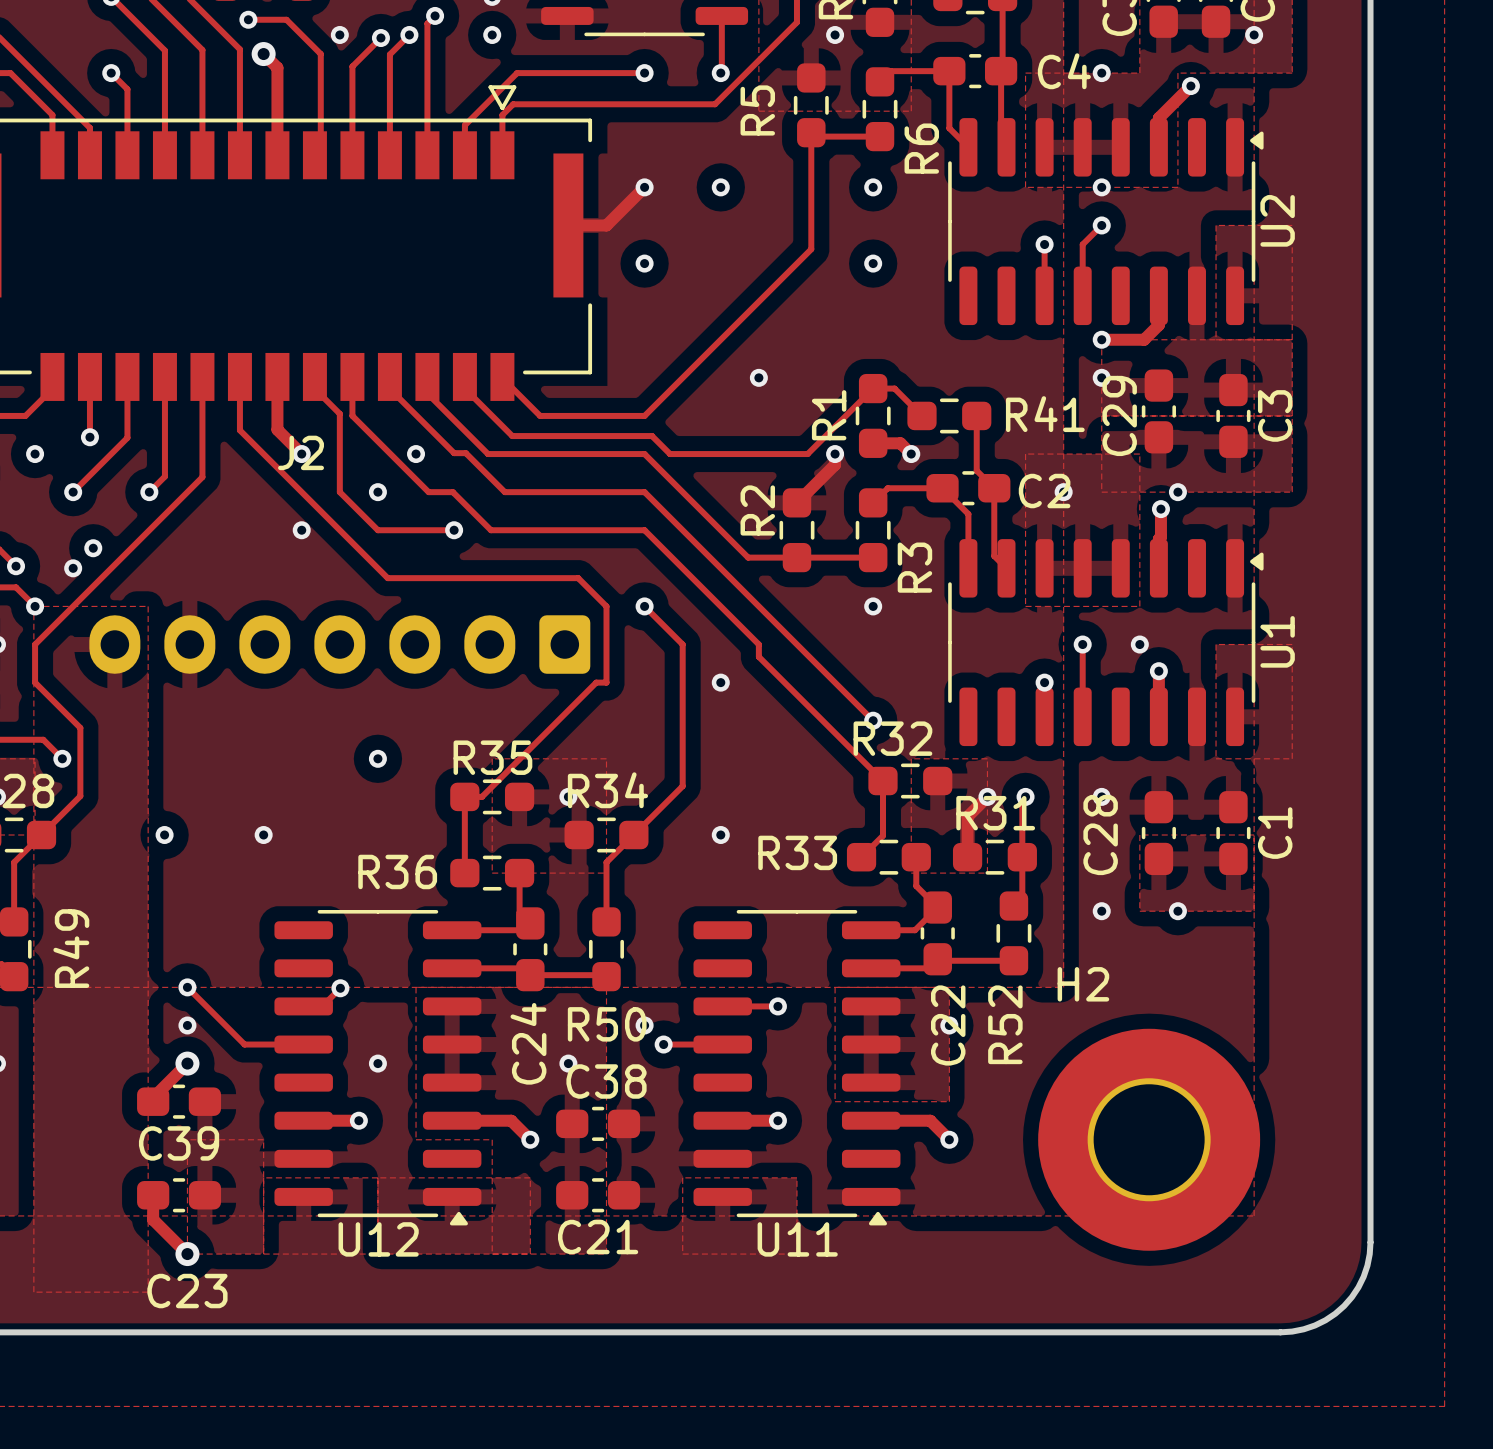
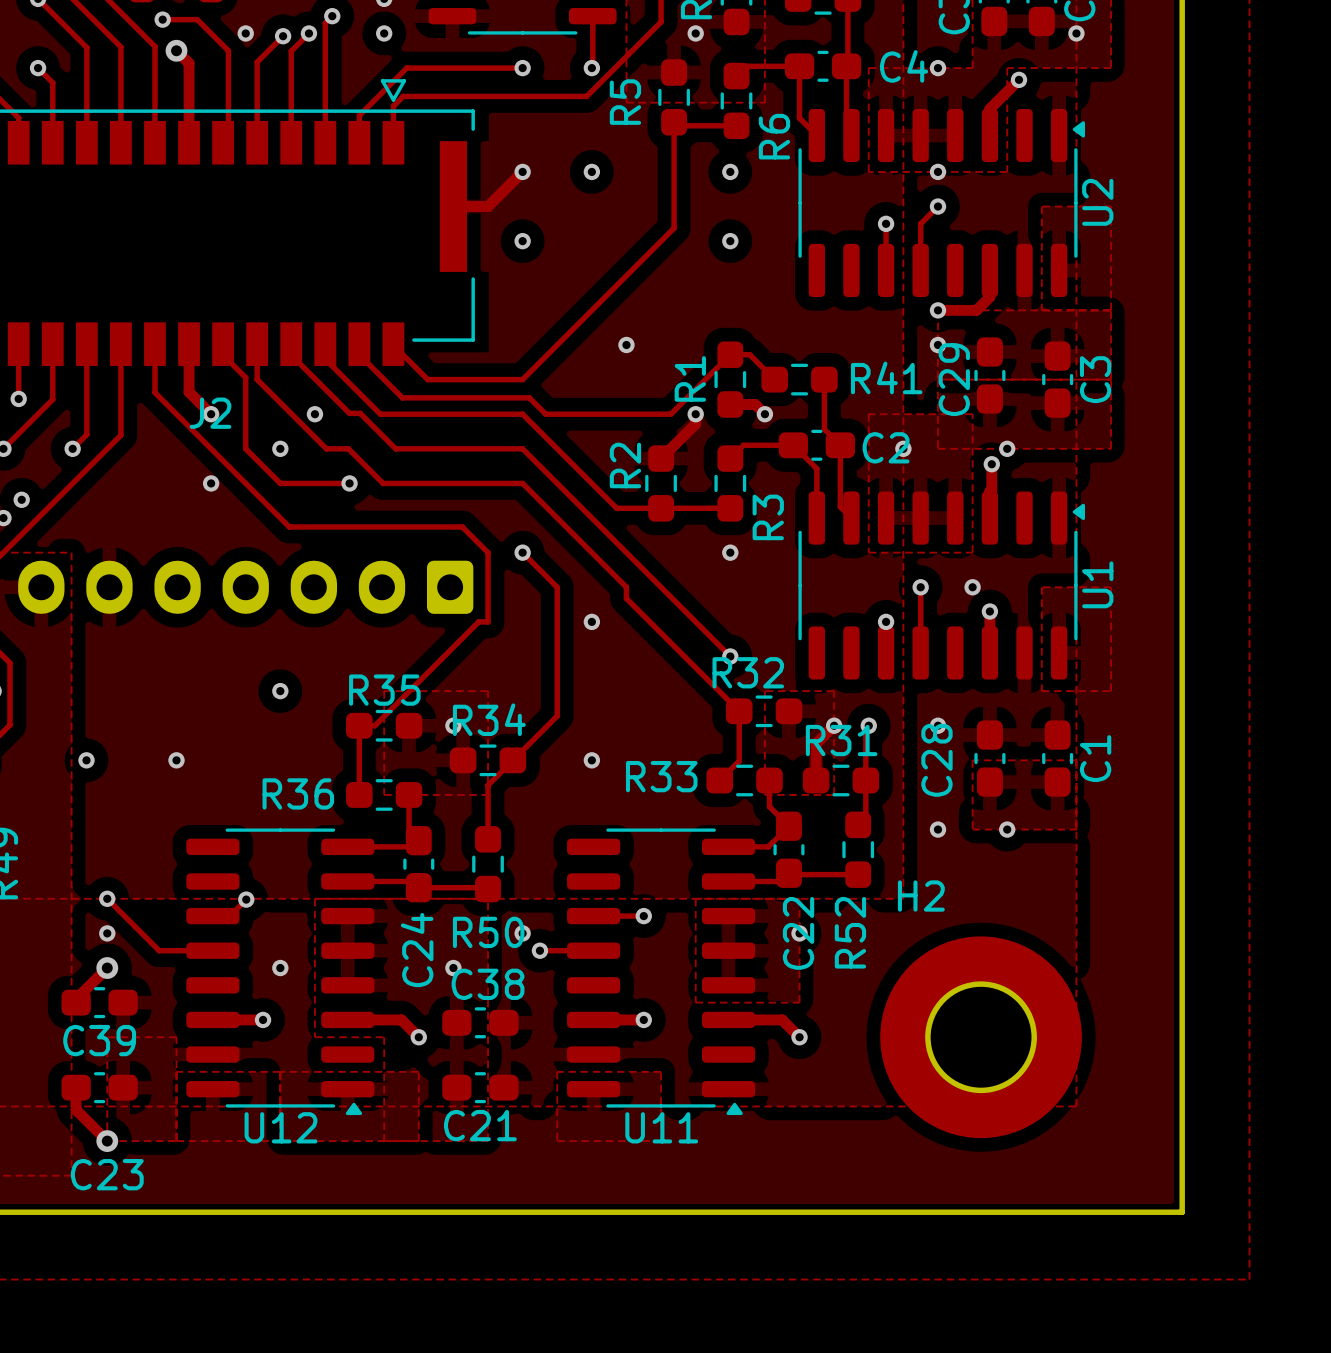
board edge: (1370, 1242) (1367, 1265) (1363, 1276) (1351, 1297) (1344, 1305) (1335, 1313) (1314, 1325) (1292, 1331) (1280, 1332) -> (1182, 1130) (1182, 1212) (1100, 1212)

